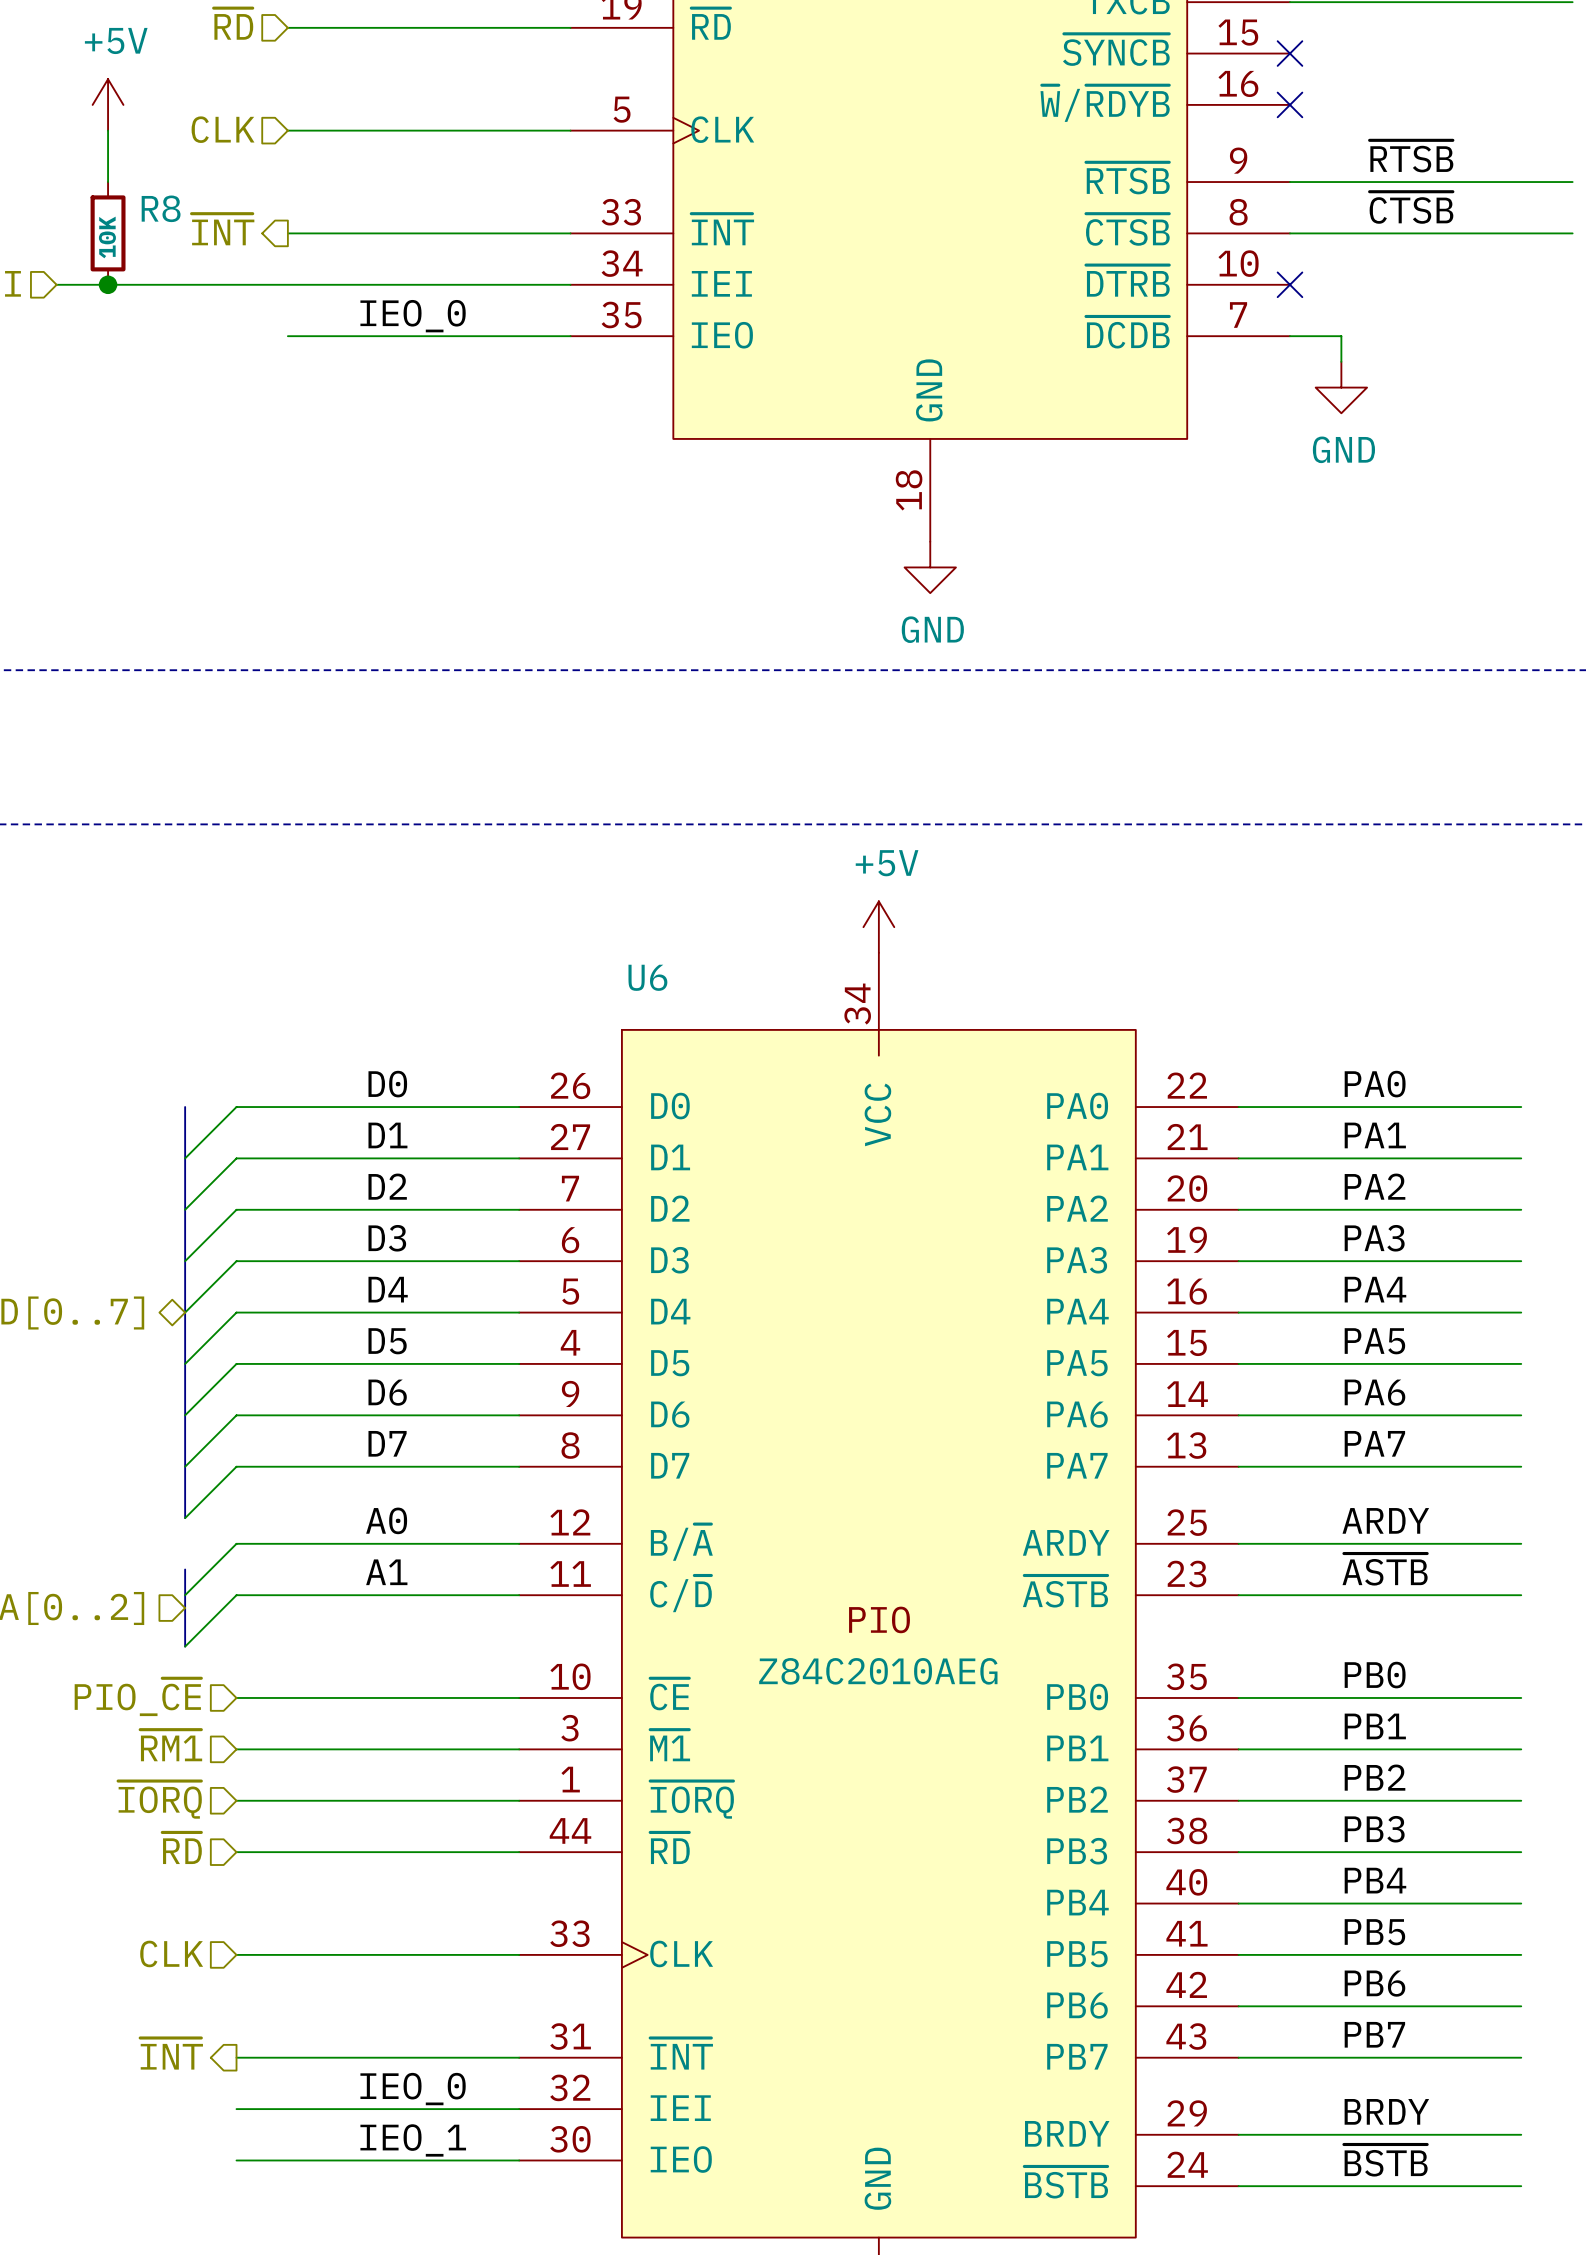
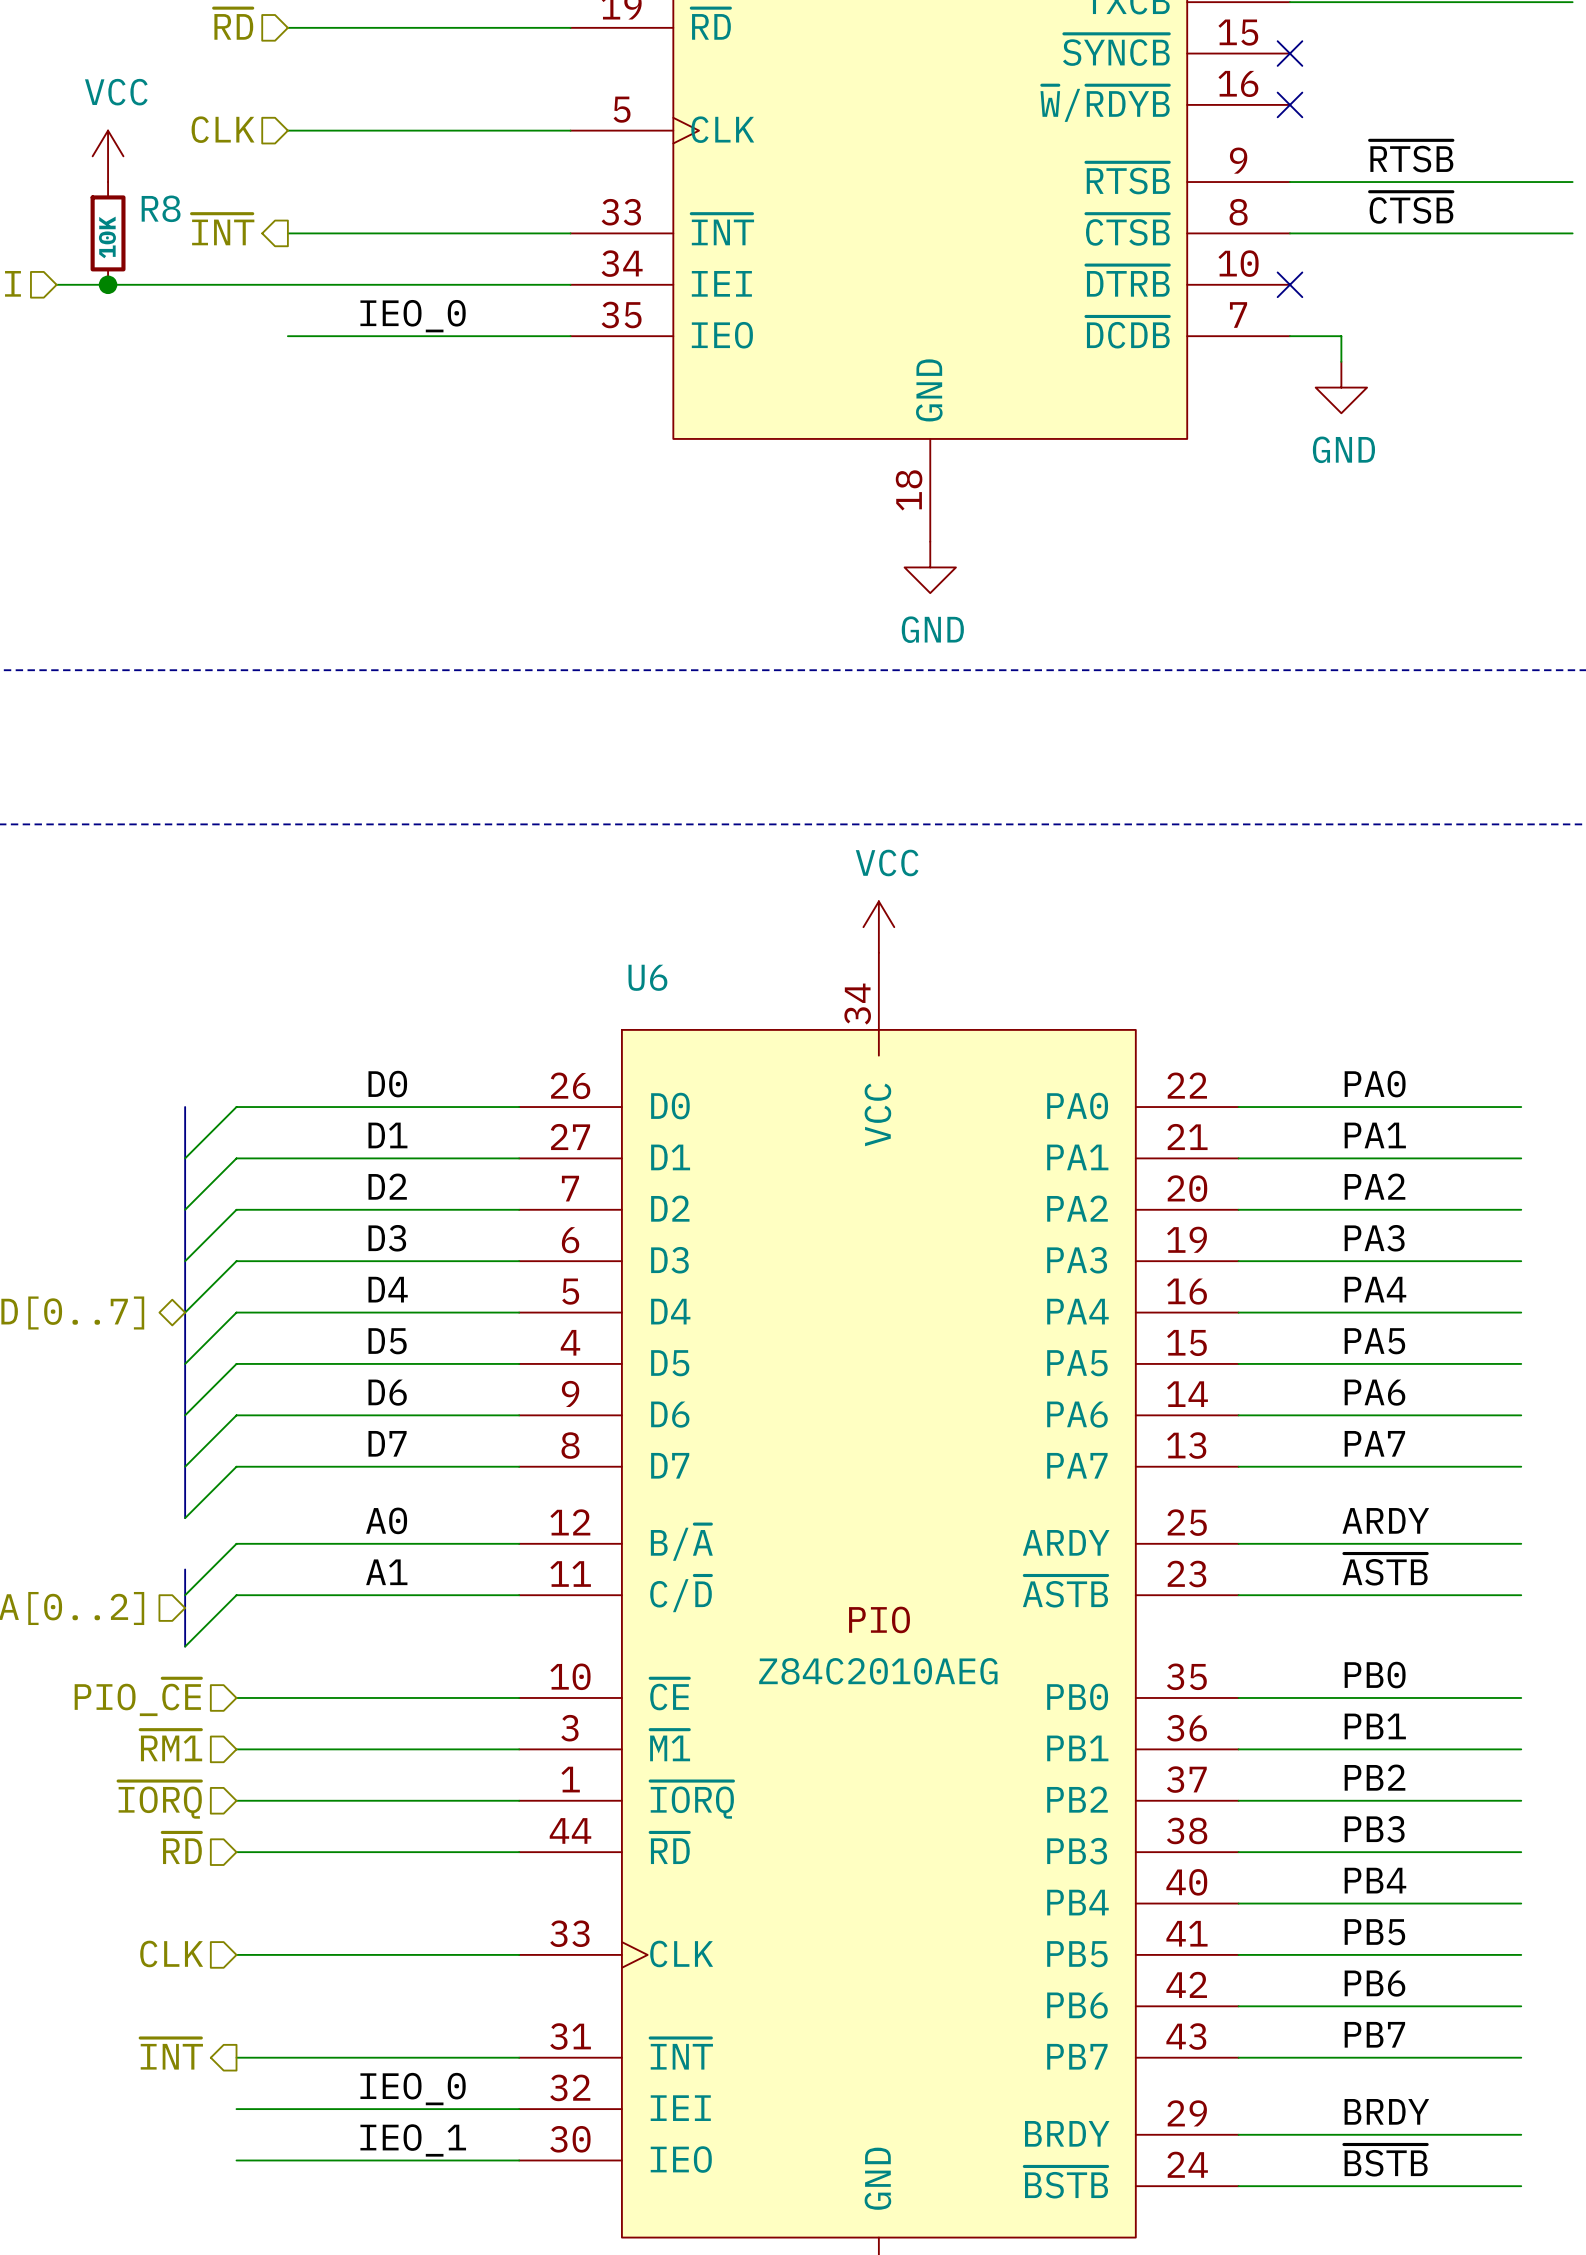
power symbol: +5V (108, 104) -> none
power symbol: none -> VCC (108, 156)
power symbol: +5V (878, 927) -> VCC (878, 927)

